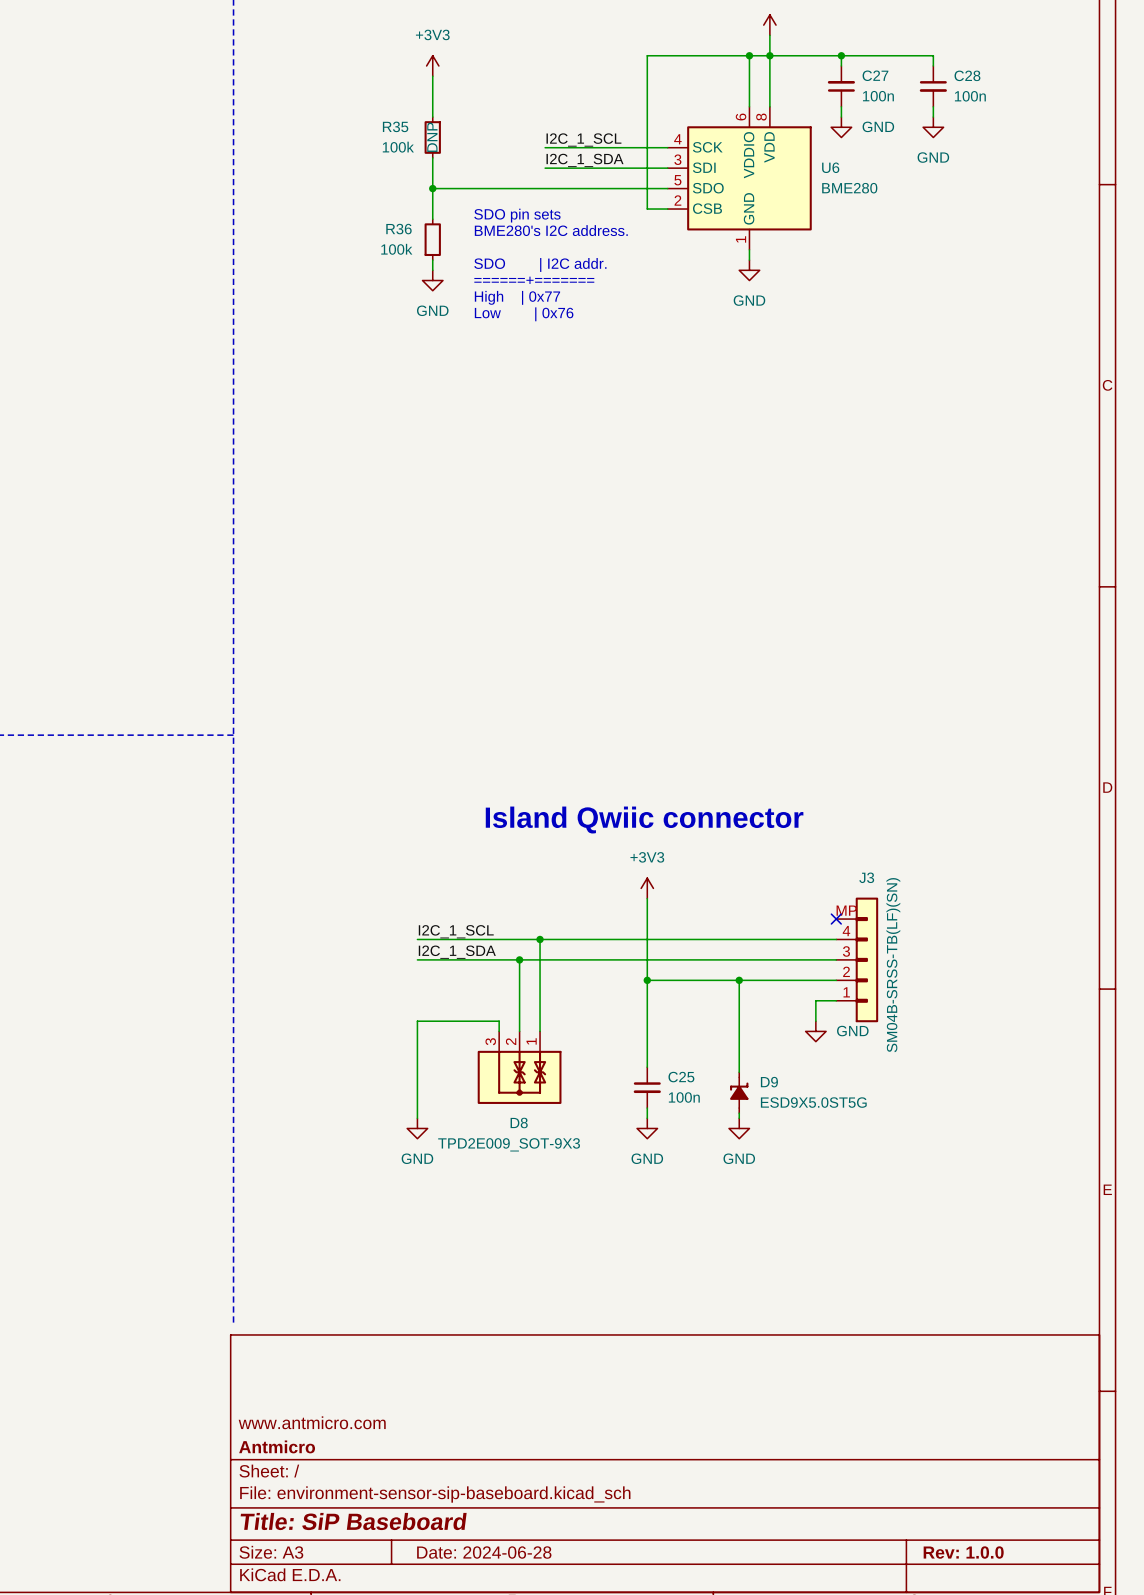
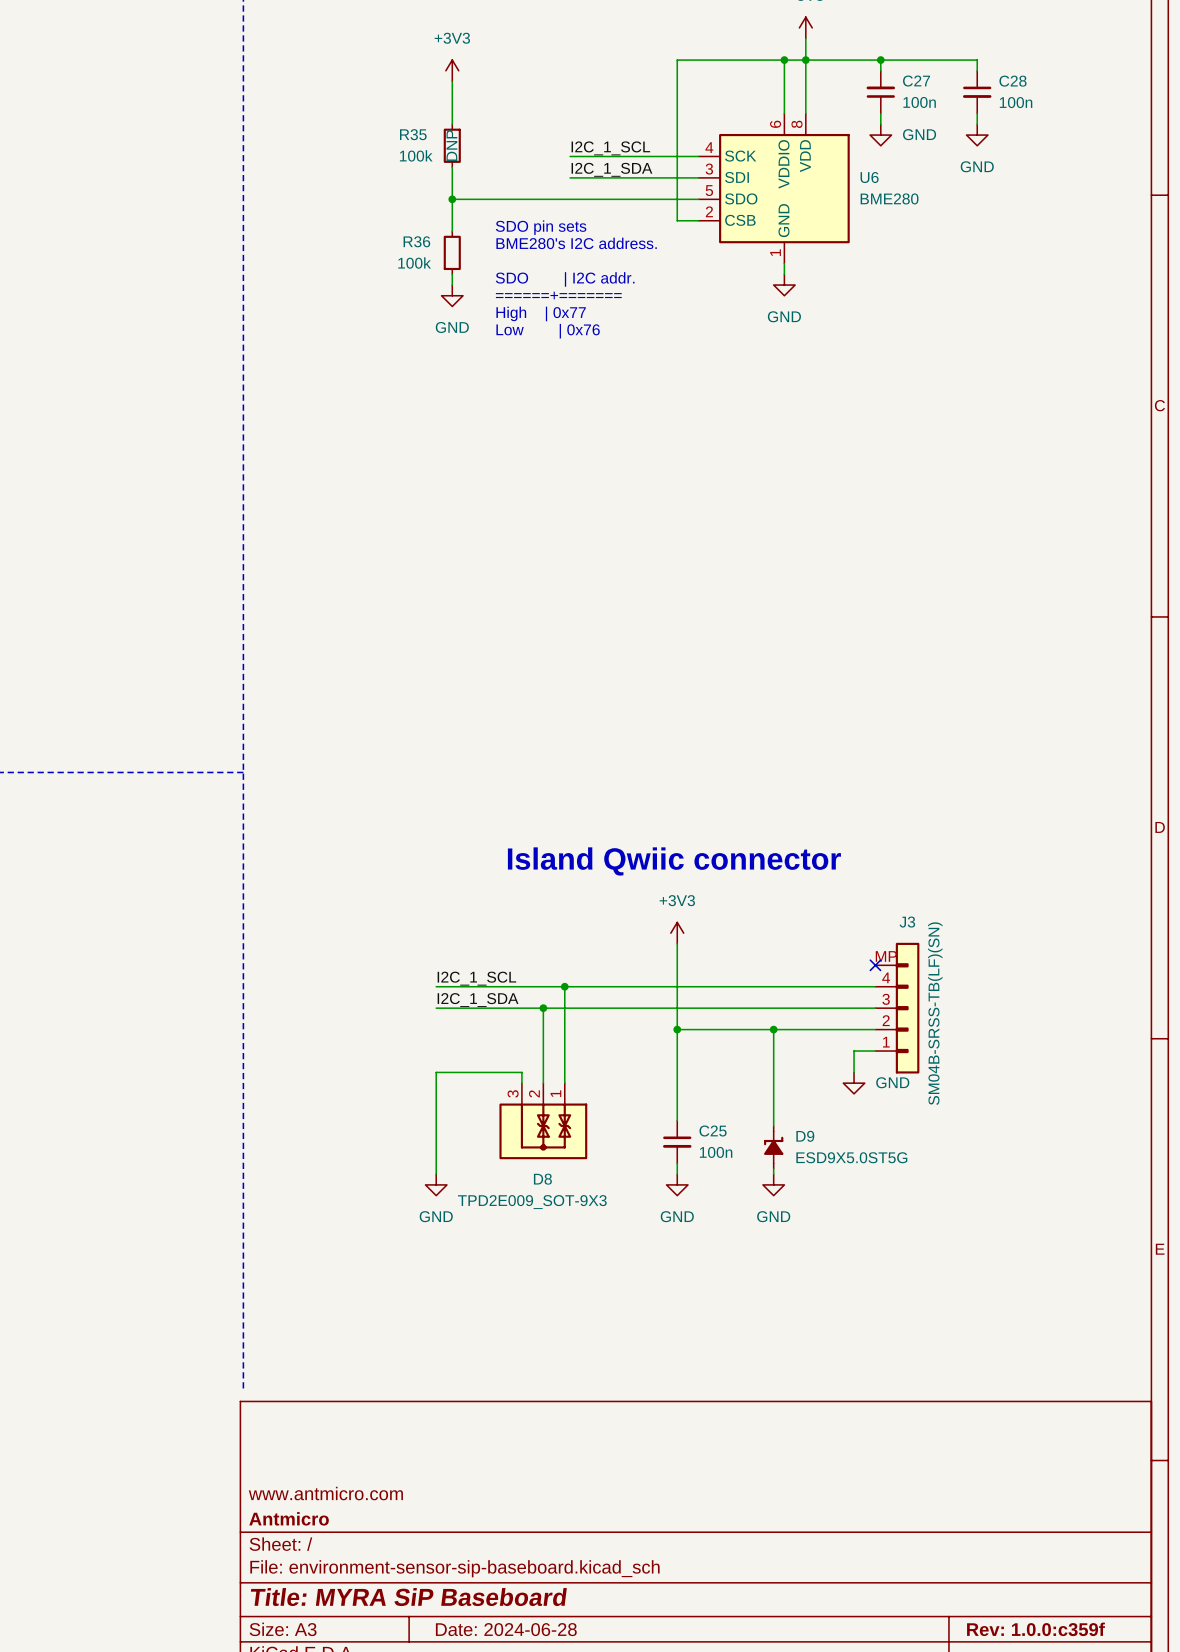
title block: Title: SiP Baseboard (353, 1521) -> Title: MYRA SiP Baseboard (408, 1597)
title block: Rev: 1.0.0 (963, 1552) -> Rev: 1.0.0:c359f (1035, 1629)

